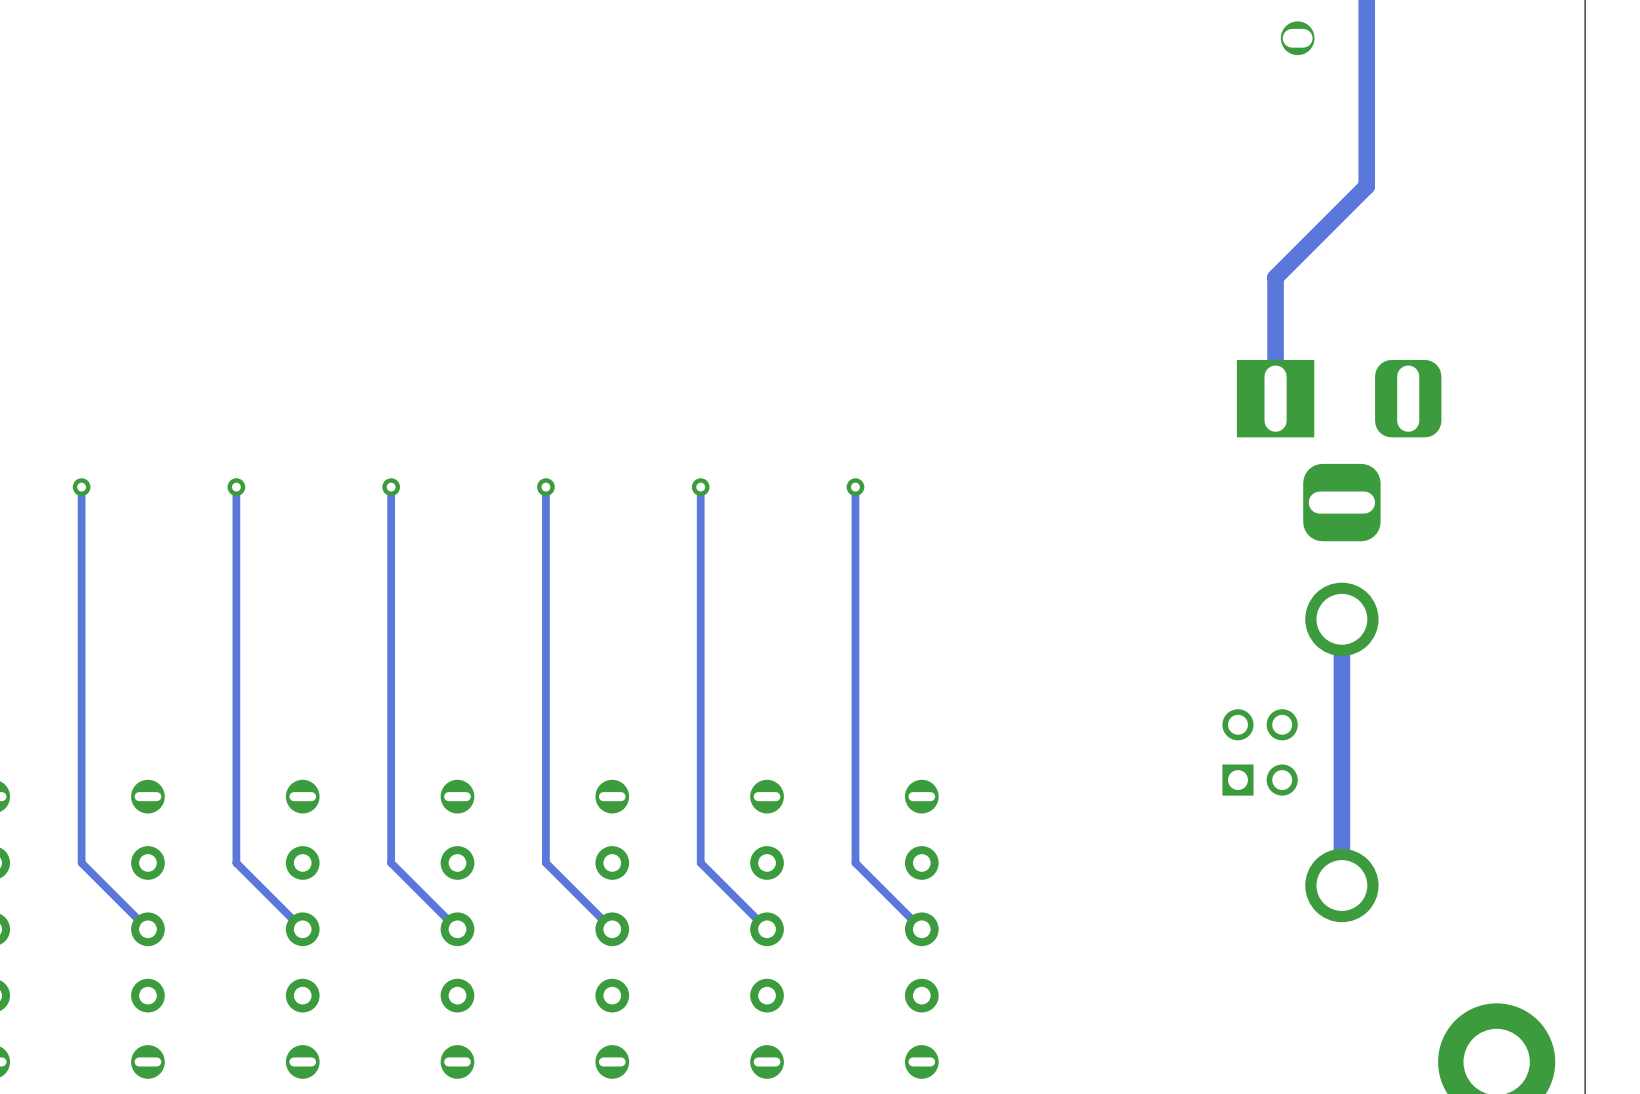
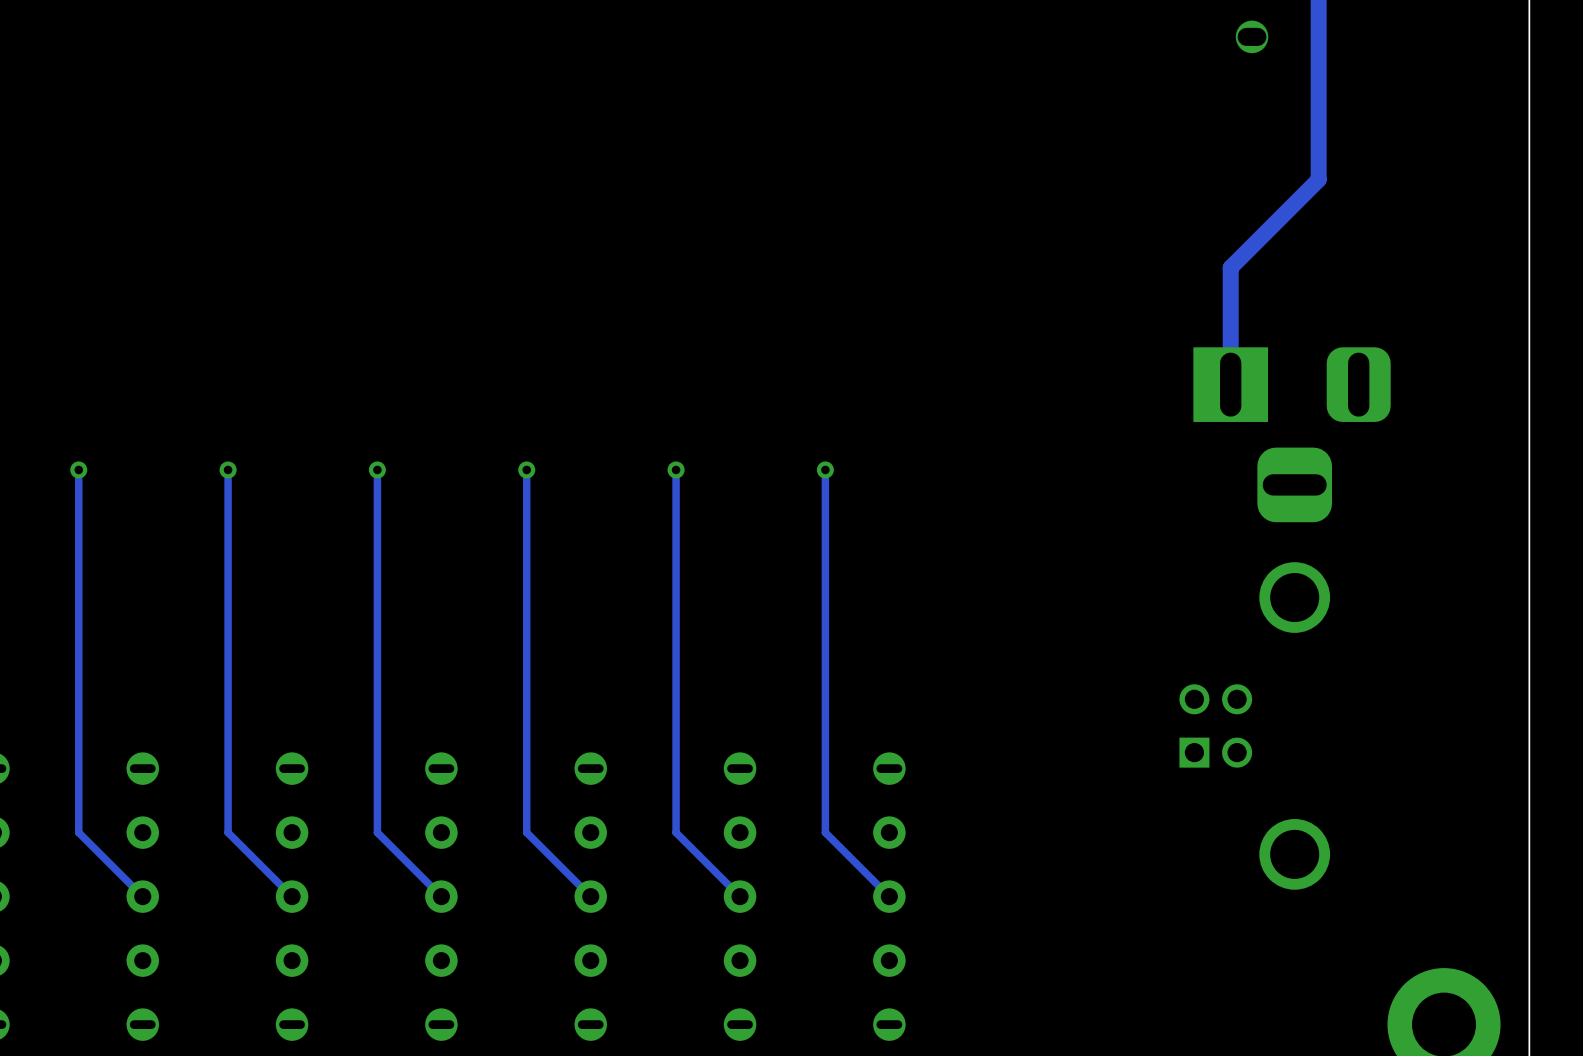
track: (1341, 619) (1341, 885) -> none

